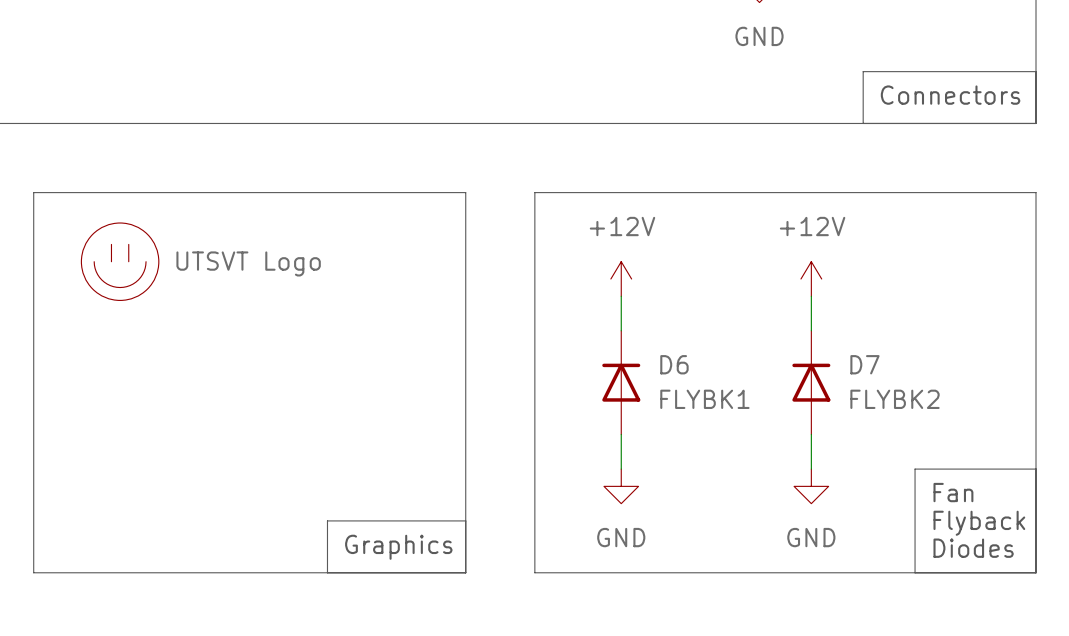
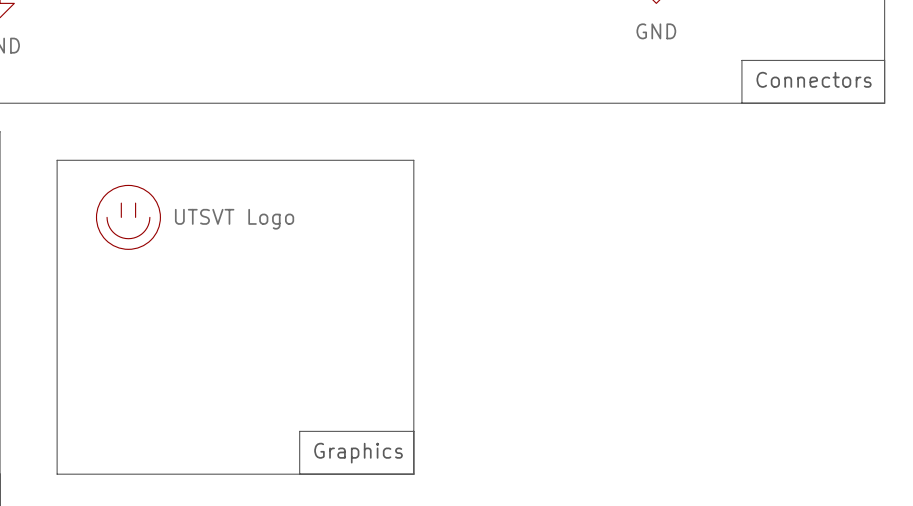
line: (534, 192) (1036, 192) (1036, 572) (534, 572) (534, 192) -> none
power symbol: +12V (621, 278) -> none
power symbol: +12V (811, 278) -> none
wire: (621, 296) (621, 330) -> none
wire: (811, 296) (811, 330) -> none
D6: FLYBK1 (621, 382) -> none
D7: FLYBK2 (811, 382) -> none
wire: (621, 434) (621, 469) -> none
wire: (811, 434) (811, 469) -> none
line: (1036, 469) (915, 469) (915, 572) -> none
power symbol: GND (621, 486) -> none
power symbol: GND (811, 486) -> none
text: Fan (953, 492) -> none
text: Flyback (979, 523) -> none
text: Diodes (973, 548) -> none

